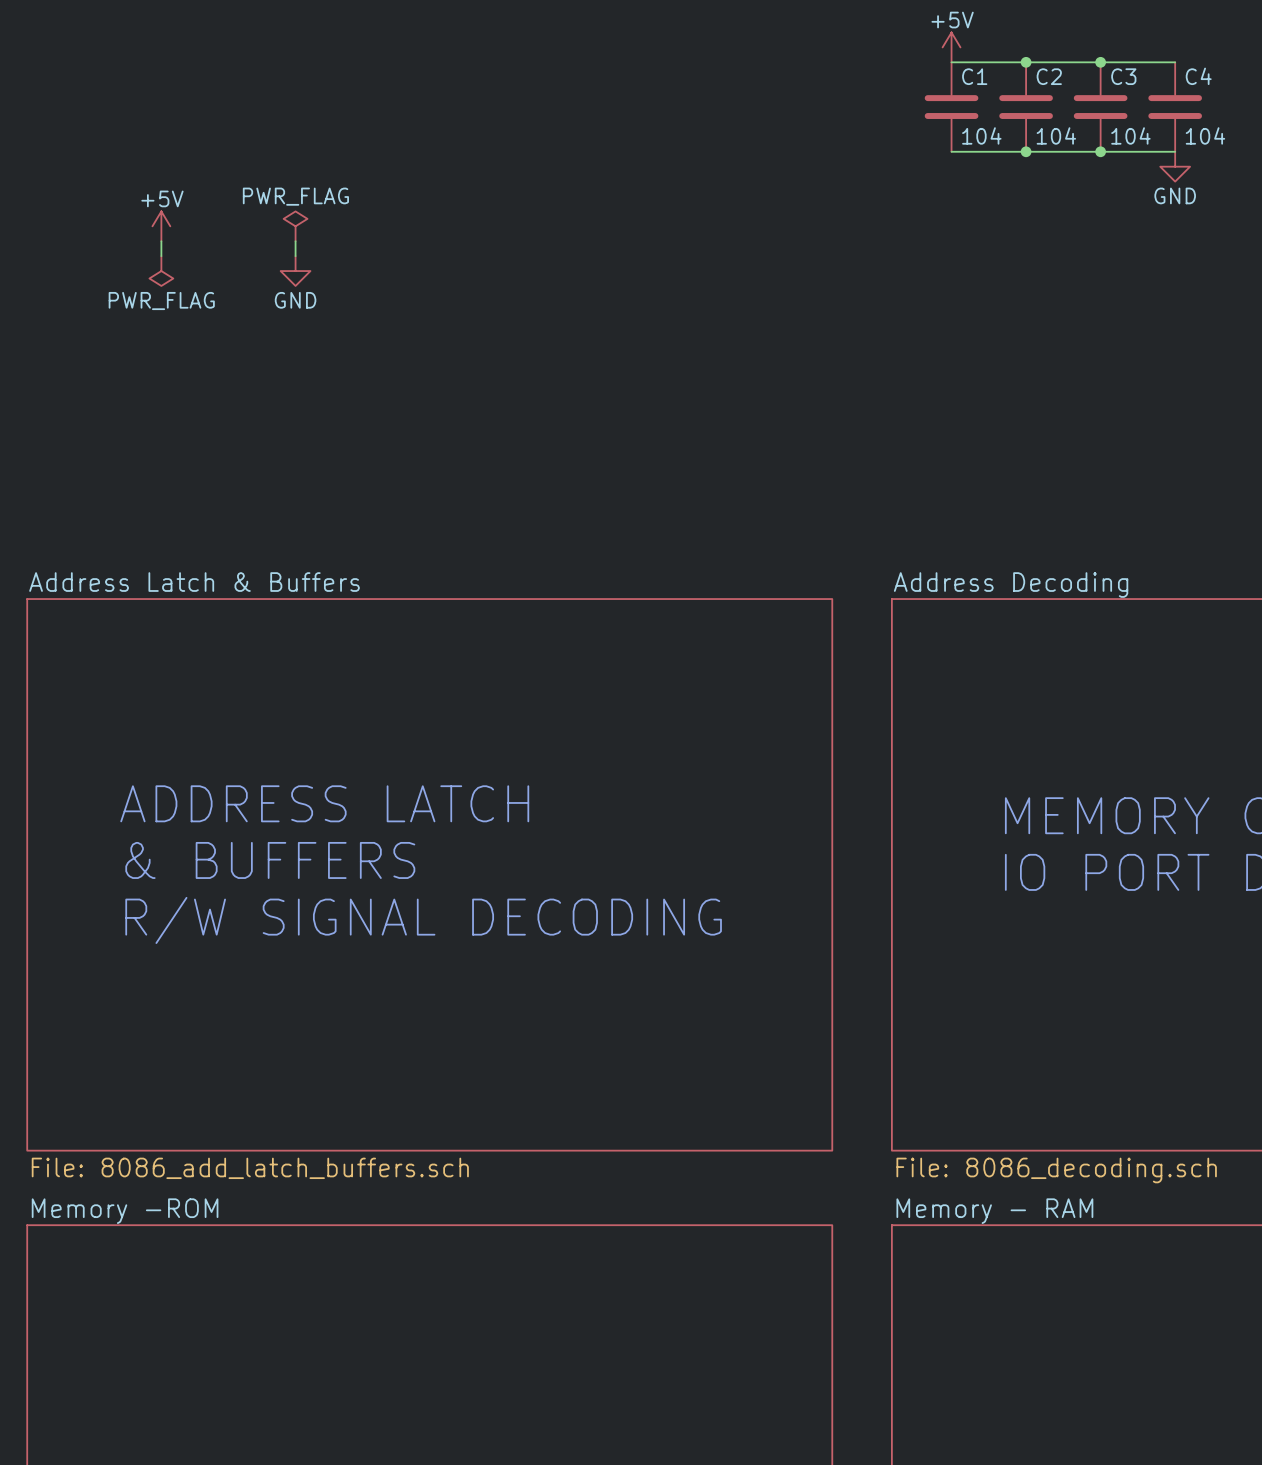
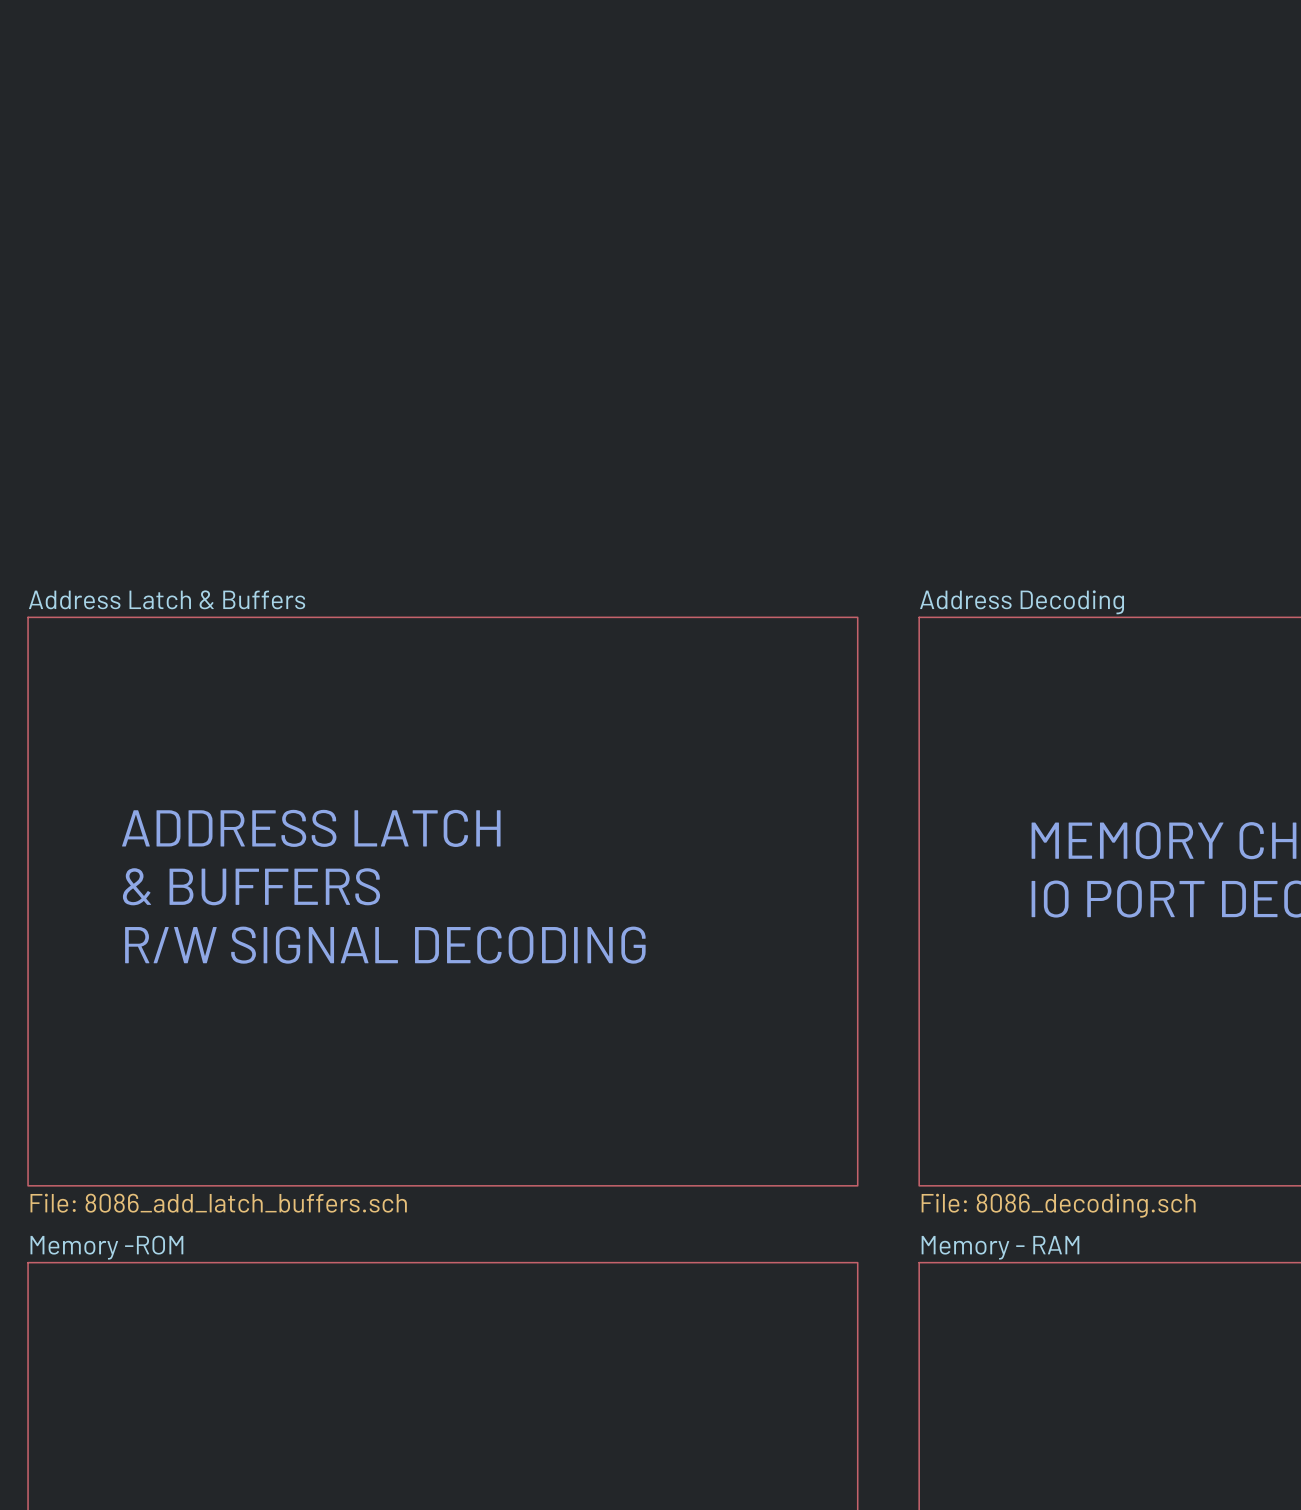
power symbol: +5V (951, 47) -> none
wire: (951, 62) (1175, 62) -> none
junction: (1026, 62) -> none
junction: (1100, 62) -> none
C1: 104 (951, 107) -> none
C2: 104 (1026, 107) -> none
C3: 104 (1100, 107) -> none
C4: 104 (1175, 107) -> none
wire: (951, 151) (1175, 151) -> none
junction: (1026, 151) -> none
junction: (1100, 151) -> none
power symbol: GND (1175, 166) -> none
power symbol: +5V (161, 226) -> none
power symbol: PWR_FLAG (295, 226) -> none
wire: (161, 241) (161, 256) -> none
wire: (295, 241) (295, 256) -> none
power symbol: PWR_FLAG (161, 271) -> none
power symbol: GND (295, 271) -> none

